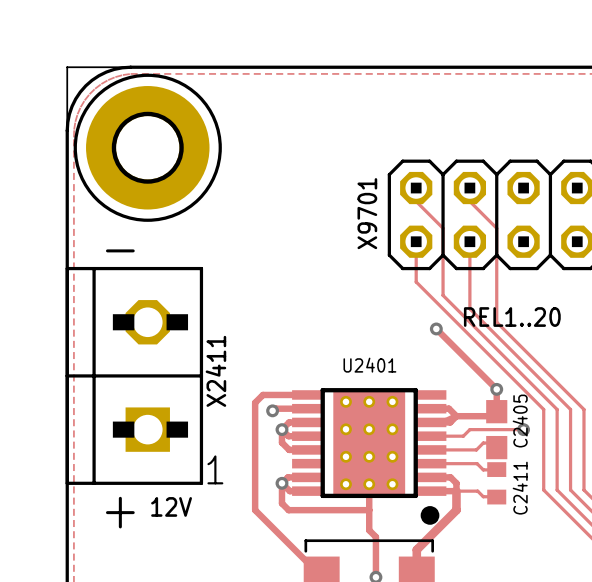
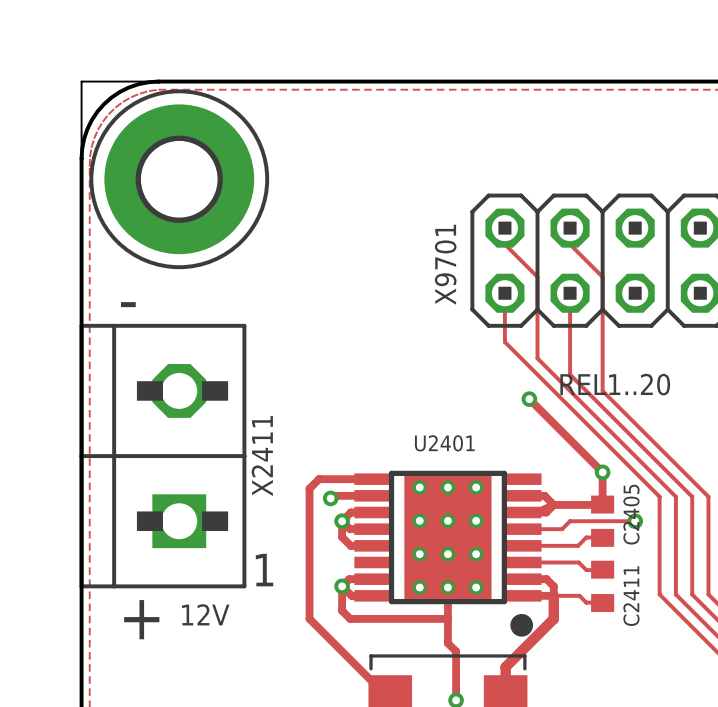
C2405 footprint: [486, 400, 508, 460] -> [591, 495, 615, 547]

